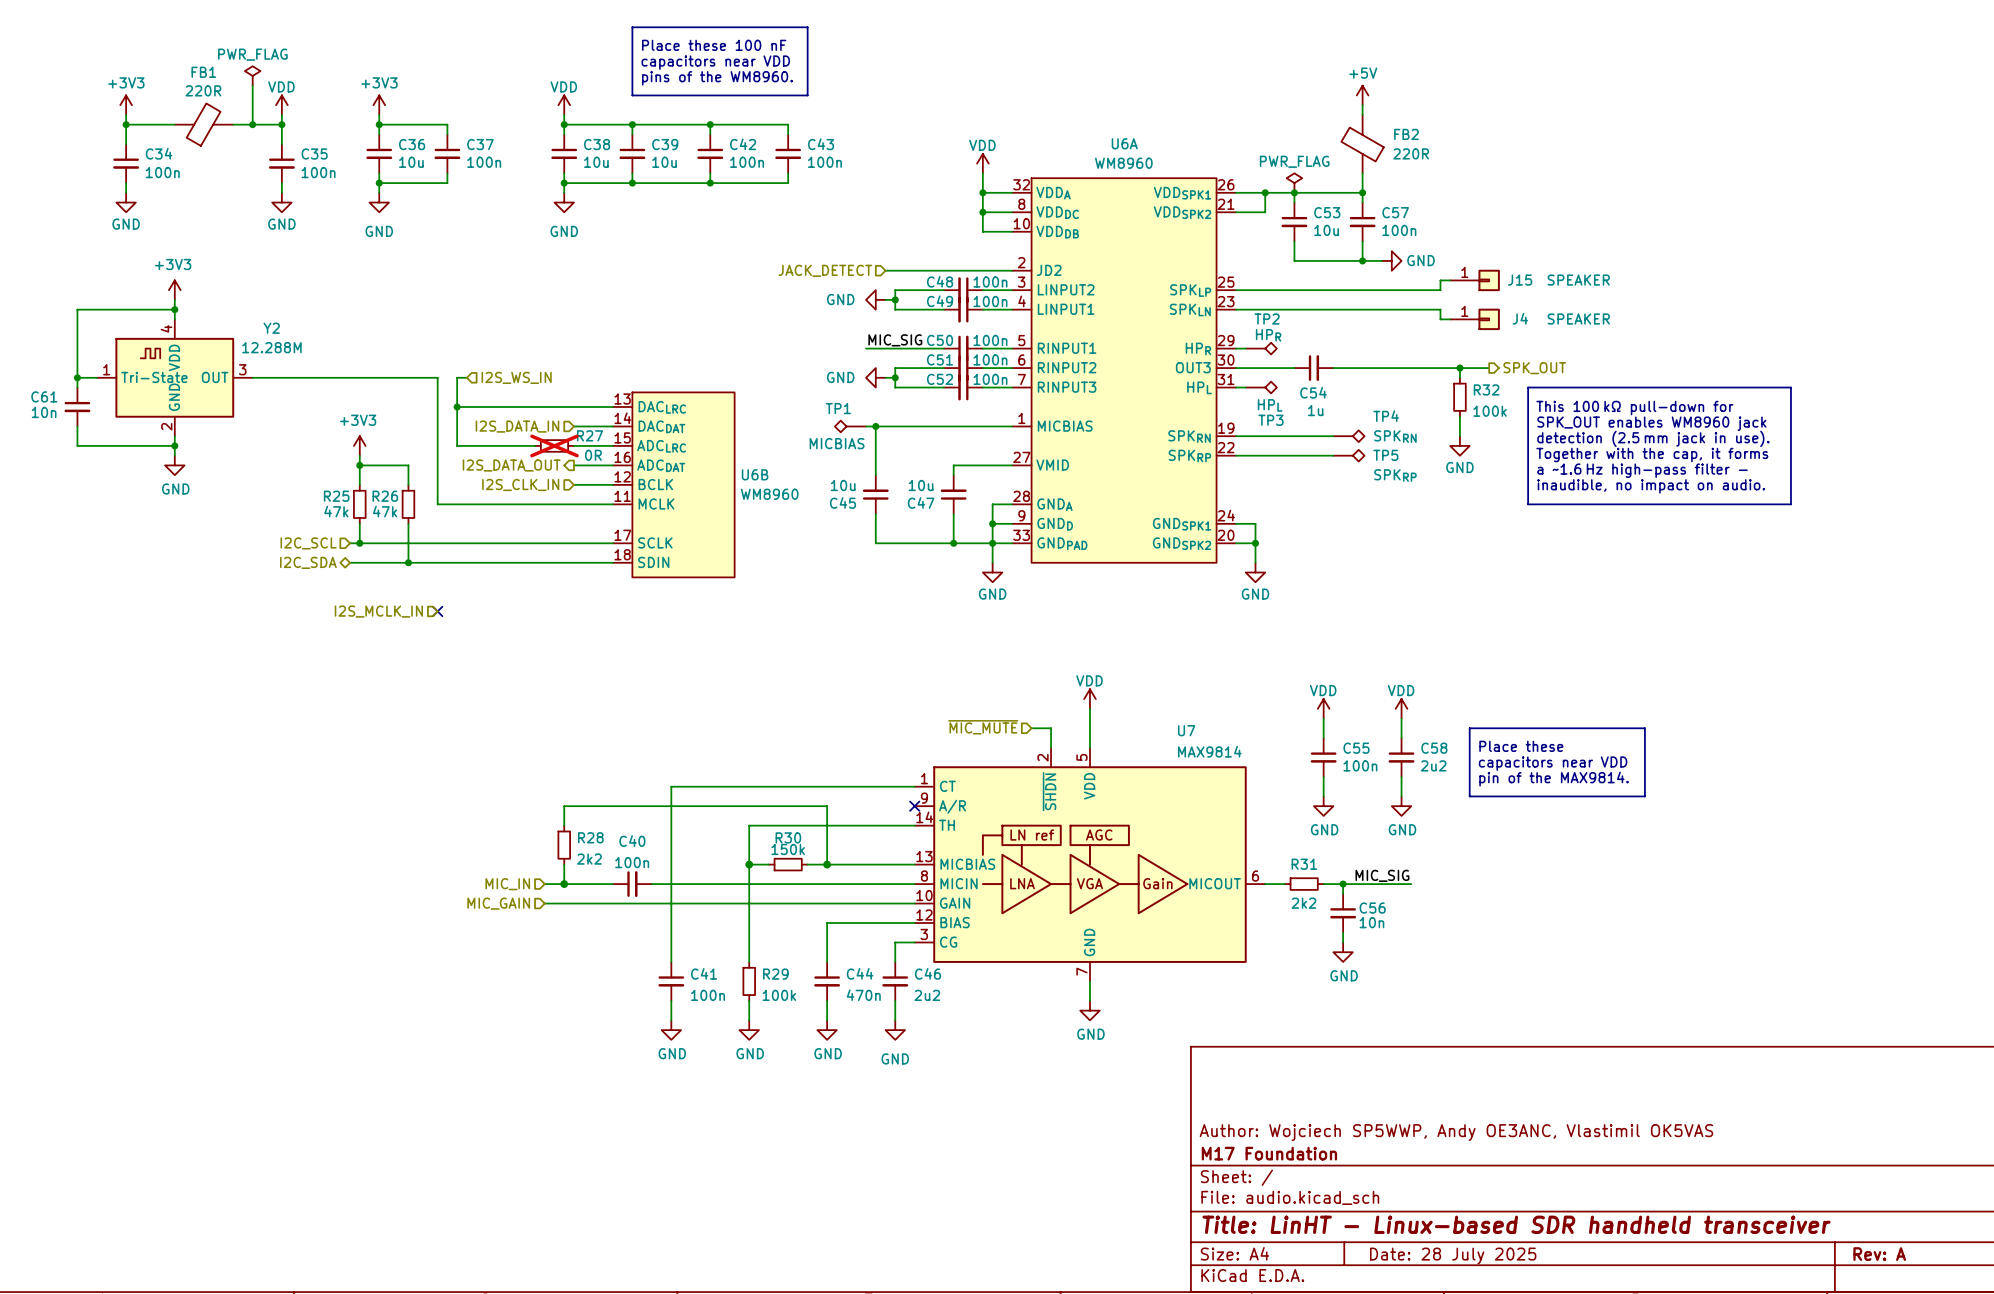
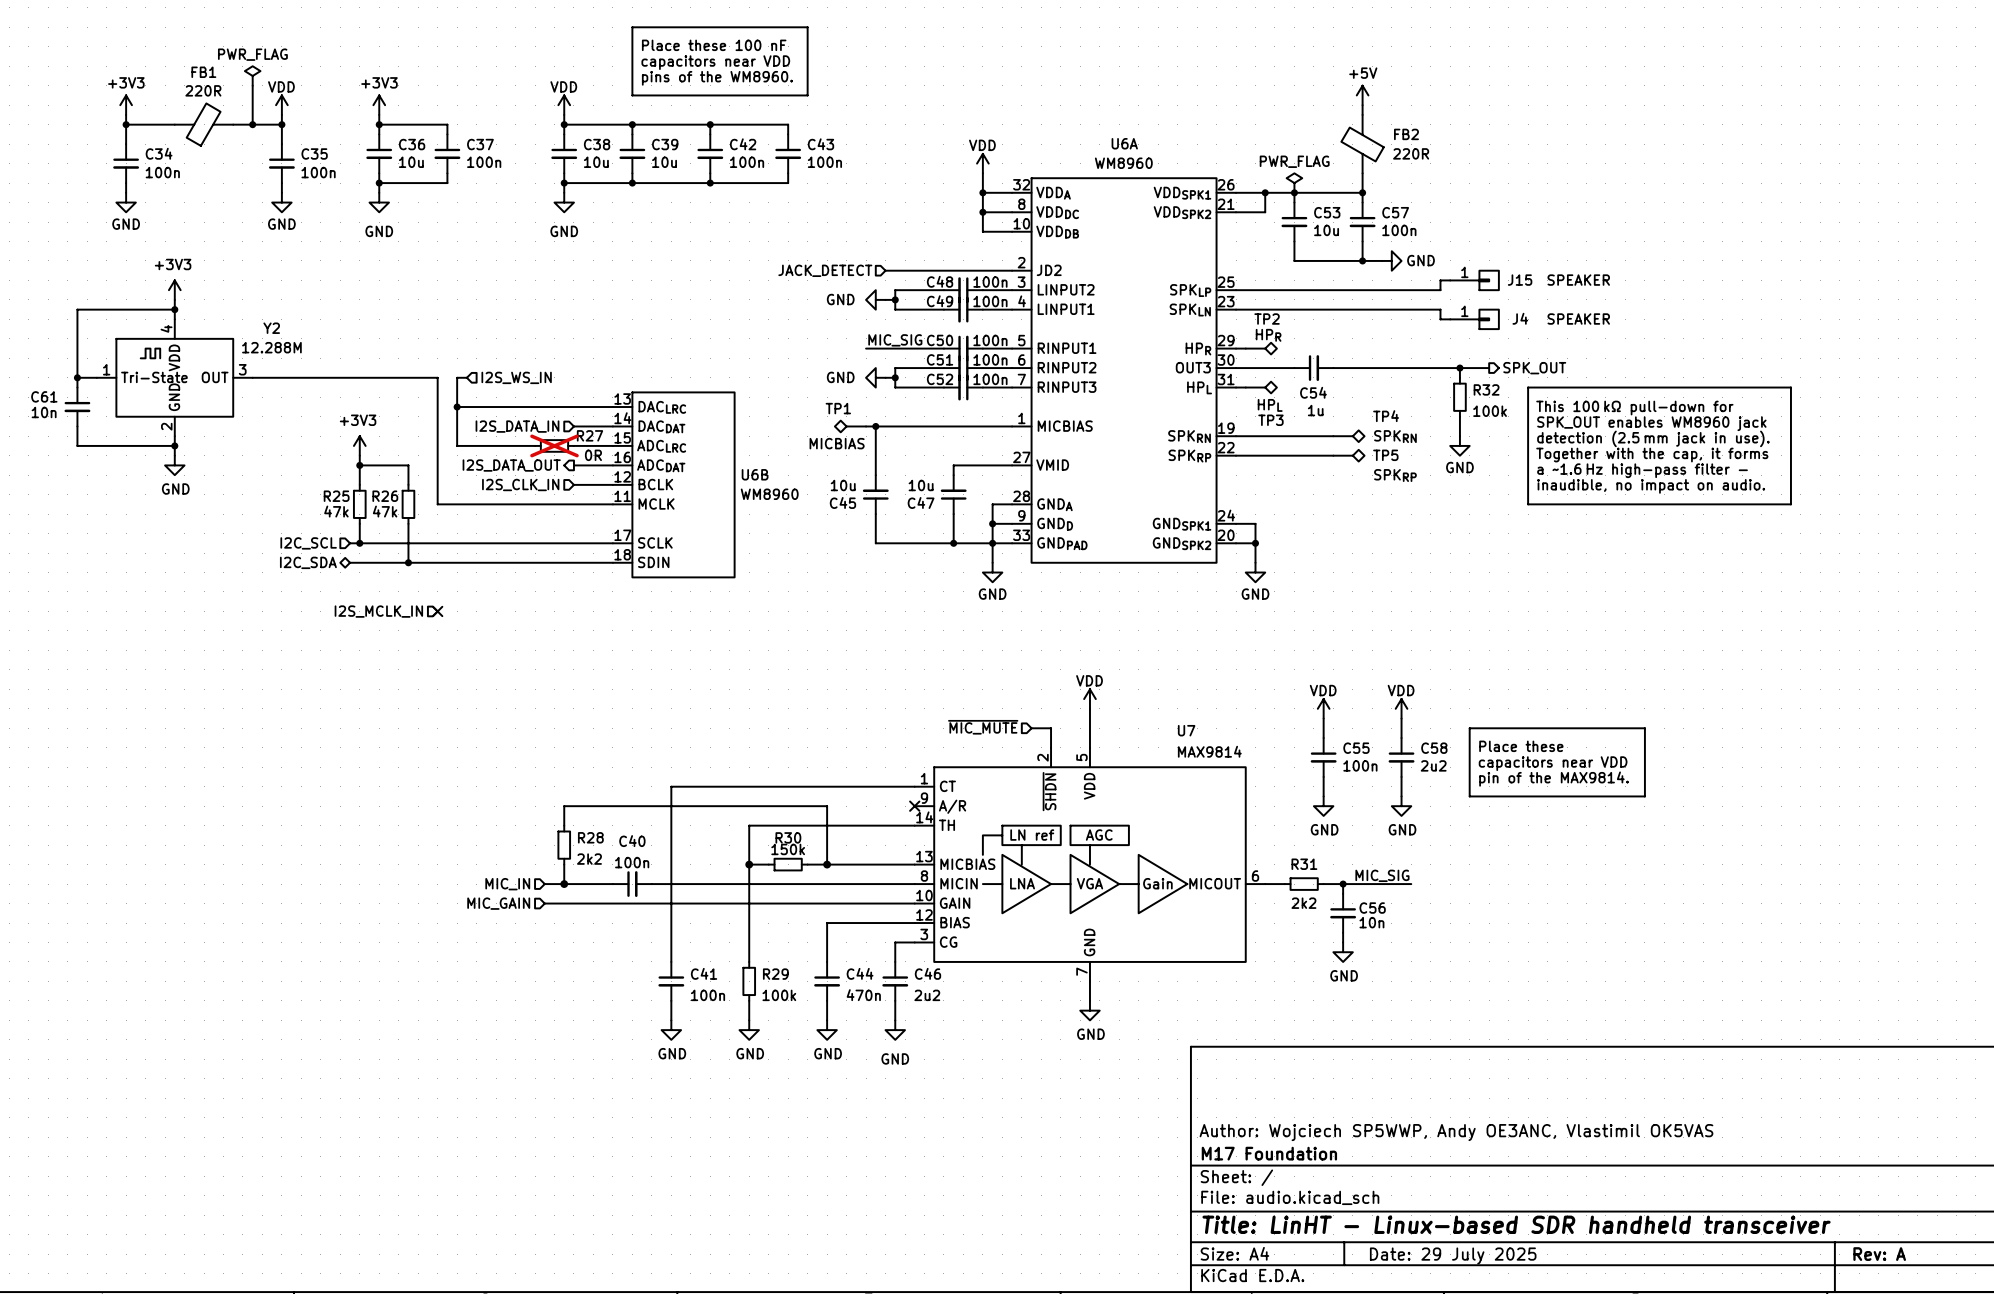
title block: Date: 28 July 2025 (1453, 1255) -> Date: 29 July 2025 (1453, 1255)

